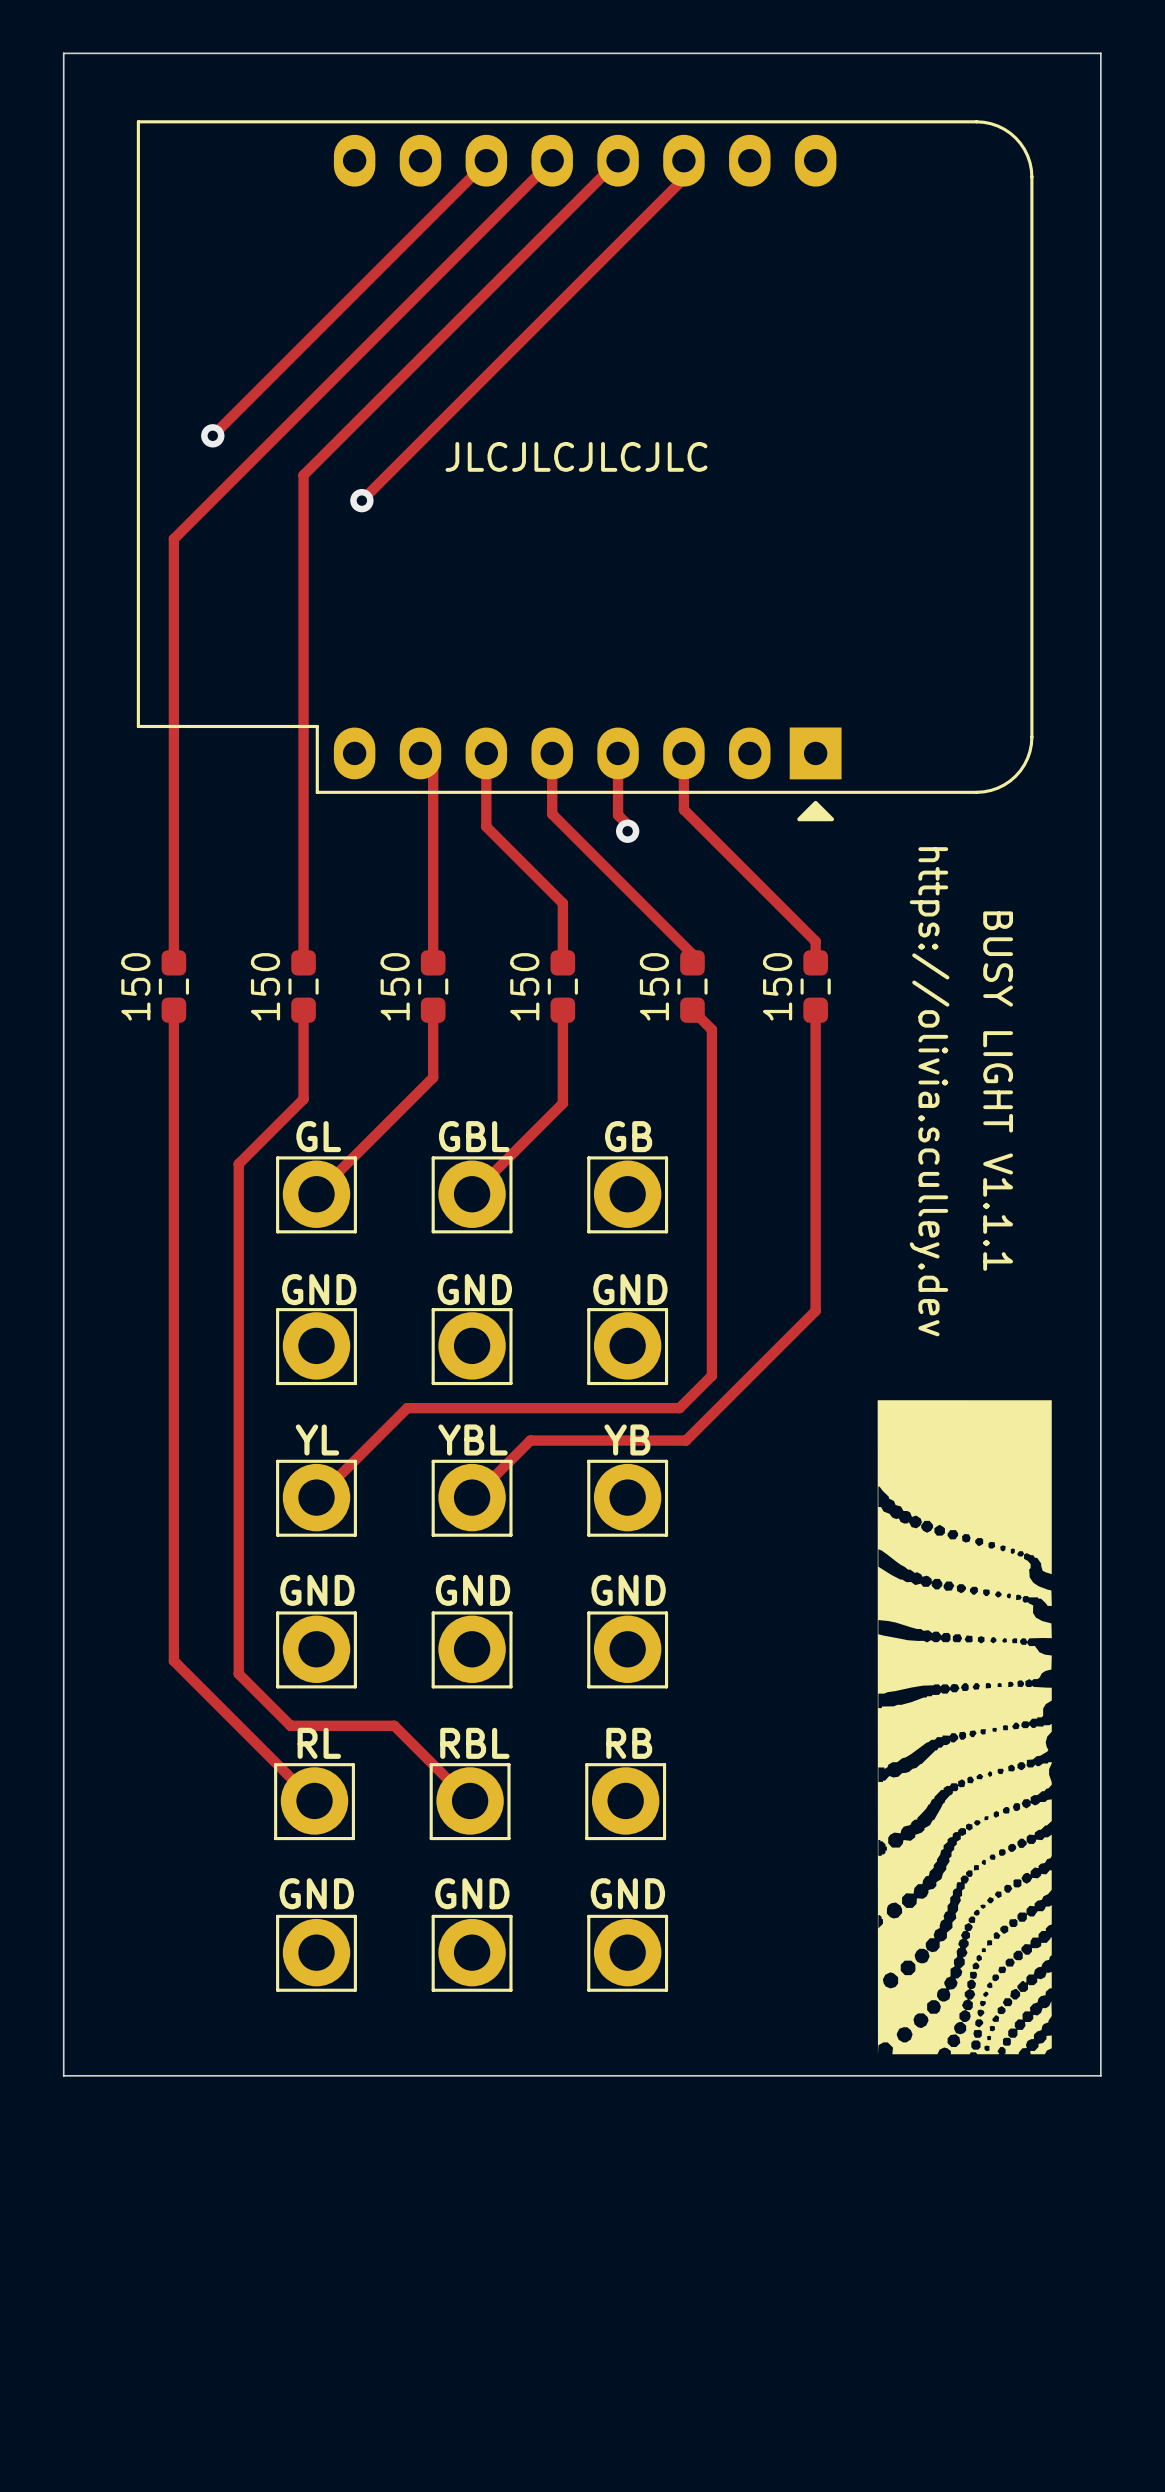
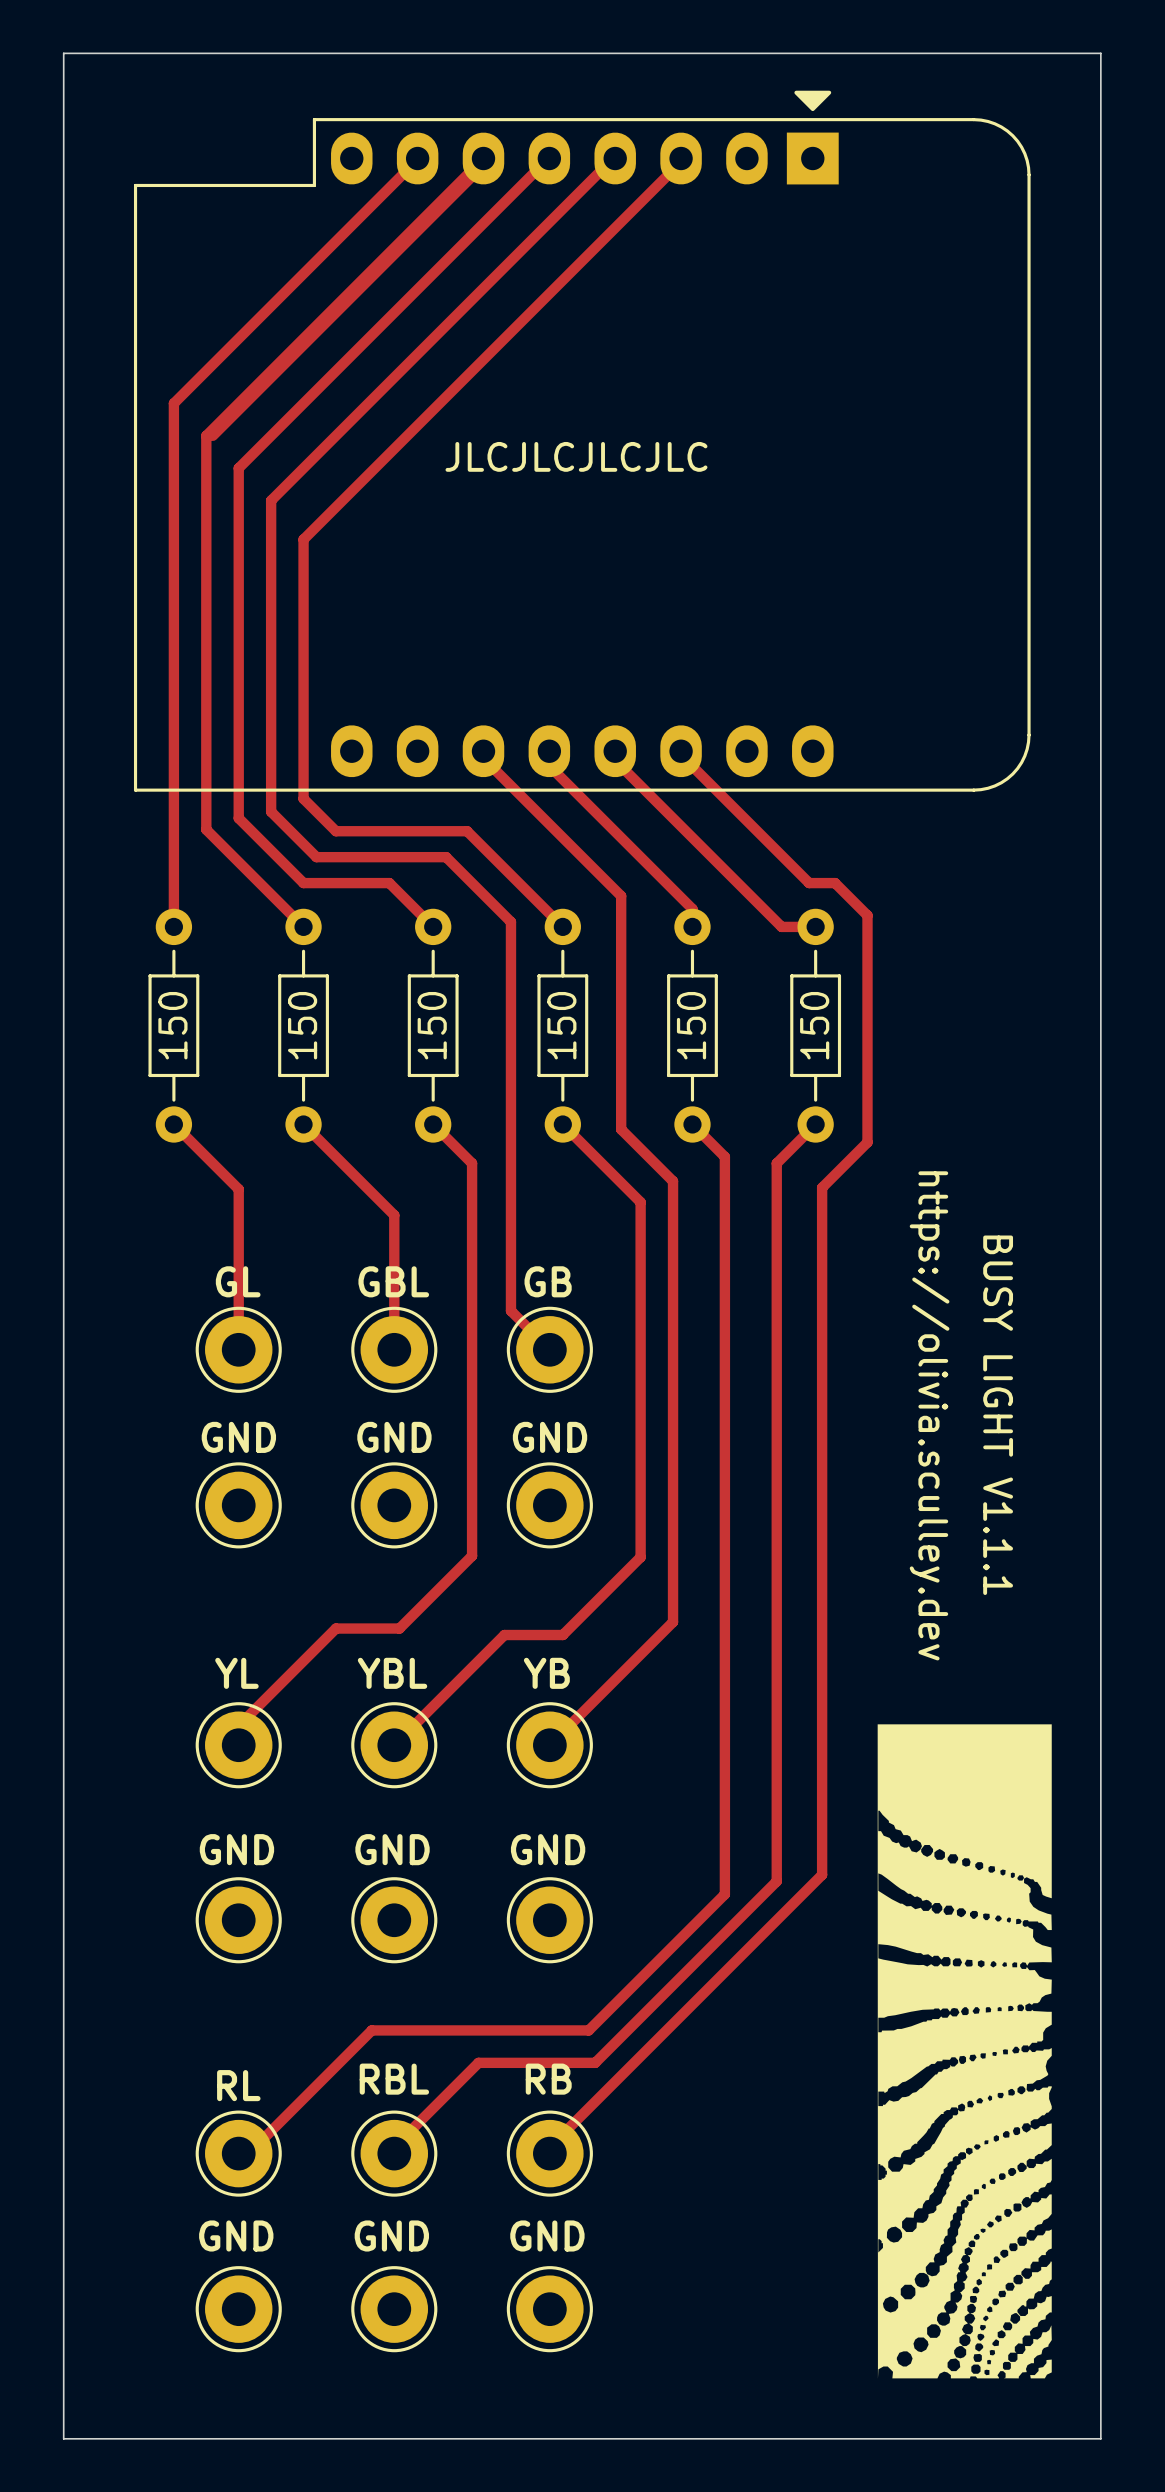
track: none -> (483, 158) (206, 435) (206, 829) (303, 926)
track: none -> (549, 158) (238, 468) (238, 818) (303, 883) (389, 883) (433, 926)
track: none -> (615, 158) (271, 500) (271, 811) (316, 857) (446, 857) (510, 921) (510, 1310) (549, 1349)
track: (552, 160) (173, 539) -> (417, 158) (173, 403) (173, 539)
track: (618, 160) (303, 475) (303, 539) -> (681, 158) (681, 162) (303, 539)
track: (683, 160) (683, 178) (361, 500) -> none
via: (212, 435) -> none
part side: bottom (585, 470) -> top (582, 441)
via: (361, 500) -> none
track: none -> (483, 751) (483, 758) (621, 896) (621, 1129) (673, 1181) (673, 1622) (549, 1745)
track: none -> (549, 751) (549, 765) (692, 909) (692, 926)
track: none -> (615, 751) (615, 760) (781, 926) (815, 926)
track: none -> (681, 751) (681, 755) (809, 883) (835, 883) (867, 915) (867, 1142) (822, 1187) (822, 1874) (549, 2147) (549, 2153)
track: (420, 753) (426, 753) (433, 759) (433, 962) -> none
track: (486, 753) (486, 826) (562, 903) (562, 962) -> none
track: (552, 753) (552, 814) (692, 954) (692, 962) -> none
track: (618, 753) (618, 815) (627, 824) (627, 831) -> none
track: (683, 753) (683, 809) (815, 941) (815, 962) -> none
track: (303, 798) (303, 962) -> (303, 798) (335, 831) (467, 831) (562, 926)
via: (627, 831) -> none
track: (173, 926) (173, 962) -> none
text position: 150 (135, 986) -> 150 (172, 1025)
part: (173, 986) -> none
text position: 150 (265, 986) -> 150 (302, 1025)
part: (303, 986) -> none
text position: 150 (395, 986) -> 150 (432, 1025)
part: (433, 986) -> none
text position: 150 (524, 986) -> 150 (561, 1025)
part: (562, 986) -> none
text position: 150 (654, 986) -> 150 (691, 1025)
part: (692, 986) -> none
text position: 150 (777, 986) -> 150 (814, 1025)
part: (815, 986) -> none
track: (173, 1010) (173, 1660) (314, 1803) -> none
track: (303, 1010) (303, 1099) (238, 1164) (238, 1189) -> (173, 1124) (238, 1189)
track: (433, 1010) (433, 1077) (316, 1194) -> none
track: (562, 1010) (562, 1103) (472, 1194) -> none
track: (692, 1010) (711, 1029) (711, 1375) (679, 1408) (407, 1408) (316, 1498) (316, 1505) -> none
track: (815, 1010) (815, 1310) (686, 1440) (530, 1440) (472, 1498) -> (433, 1124) (472, 1163) (472, 1498)
part: none -> (173, 1025)
part: none -> (303, 1025)
part: none -> (433, 1025)
part: none -> (562, 1025)
part: none -> (692, 1025)
part: none -> (815, 1025)
text position: https://olivia.sculley.dev (929, 1091) -> https://olivia.sculley.dev (929, 1415)
text position: BUSY LIGHT V1.1.1 (998, 1091) -> BUSY LIGHT V1.1.1 (998, 1415)
track: none -> (303, 1124) (394, 1215) (394, 1351)
track: none -> (562, 1124) (640, 1202) (640, 1557) (562, 1635) (504, 1635) (394, 1745)
track: none -> (692, 1124) (724, 1156) (724, 1894) (588, 2030) (371, 2030) (248, 2153) (238, 2153)
track: none -> (815, 1124) (776, 1163) (776, 1881) (595, 2062) (478, 2062) (394, 2147) (394, 2153)
text position: GL (318, 1136) -> GL (238, 1281)
text position: GBL (474, 1136) -> GBL (393, 1281)
text position: GB (628, 1136) -> GB (548, 1281)
part: (316, 1194) -> none
part: (472, 1194) -> none
part: (627, 1194) -> none
text: GND (319, 1289) -> none
text: GND (474, 1289) -> none
text: GND (630, 1289) -> none
part: (316, 1346) -> none
part: (472, 1346) -> none
part: (627, 1346) -> none
part: none -> (238, 1349)
part: none -> (394, 1349)
part: none -> (549, 1349)
track: (238, 1351) (238, 1673) (290, 1725) (394, 1725) (470, 1803) -> none
text: none -> GND (238, 1437)
text: none -> GND (394, 1437)
text: none -> GND (550, 1437)
text position: YL (317, 1439) -> YL (236, 1673)
text position: YBL (473, 1439) -> YBL (392, 1673)
text position: YB (627, 1439) -> YB (546, 1673)
part: (316, 1498) -> none
part: (472, 1498) -> none
part: (627, 1498) -> none
part: none -> (238, 1505)
part: none -> (394, 1505)
track: none -> (472, 1505) (472, 1555) (399, 1628) (335, 1628) (238, 1725) (238, 1745)
part: none -> (549, 1505)
text: GND (317, 1590) -> none
text: GND (473, 1590) -> none
text: GND (628, 1590) -> none
part: (316, 1649) -> none
part: (472, 1649) -> none
part: (627, 1649) -> none
drawing position: (964, 1727) -> (964, 2051)
text position: RL (319, 1743) -> RL (238, 2085)
text position: RBL (474, 1743) -> RBL (394, 2079)
text position: RB (629, 1743) -> RB (548, 2079)
part: none -> (238, 1745)
part: none -> (394, 1745)
part: none -> (549, 1745)
part: (314, 1801) -> none
part: (470, 1801) -> none
part: (625, 1801) -> none
text: none -> GND (236, 1849)
text: none -> GND (392, 1849)
text: none -> GND (548, 1849)
text: GND (316, 1893) -> none
text: GND (472, 1893) -> none
text: GND (627, 1893) -> none
part: none -> (238, 1920)
part: none -> (394, 1920)
part: none -> (549, 1920)
part: (316, 1953) -> none
part: (472, 1953) -> none
part: (627, 1953) -> none
drawing position: (1040, 2044) -> (1040, 2368)
board edge: (63, 2075) (1100, 2075) -> (63, 2075) (63, 2438) (1100, 2438) (1100, 2075)
part: none -> (238, 2153)
part: none -> (394, 2153)
part: none -> (549, 2153)
text: none -> GND (236, 2235)
text: none -> GND (391, 2235)
text: none -> GND (547, 2235)
part: none -> (238, 2309)
part: none -> (394, 2309)
part: none -> (549, 2309)

